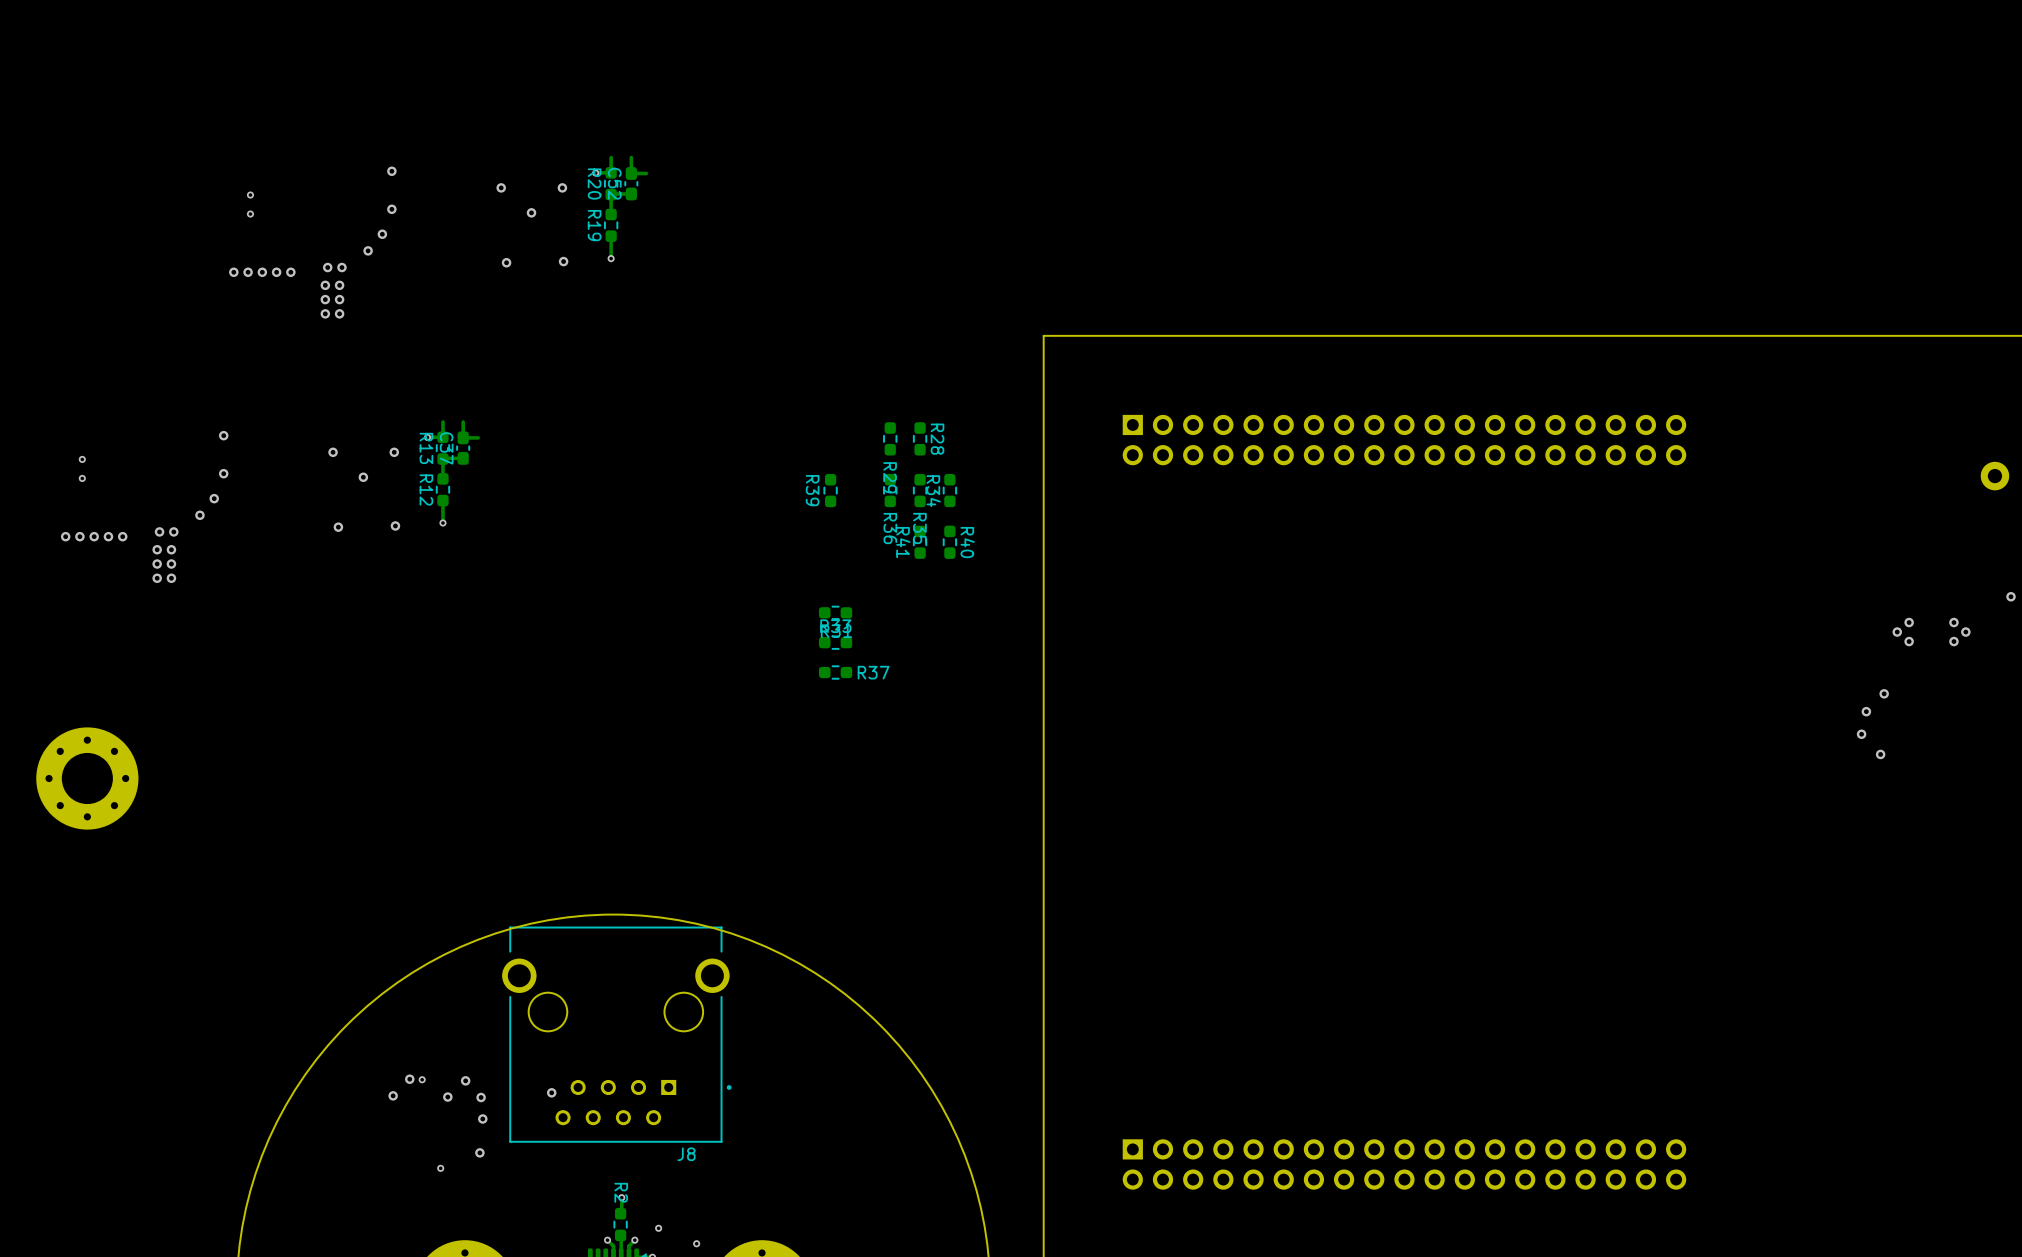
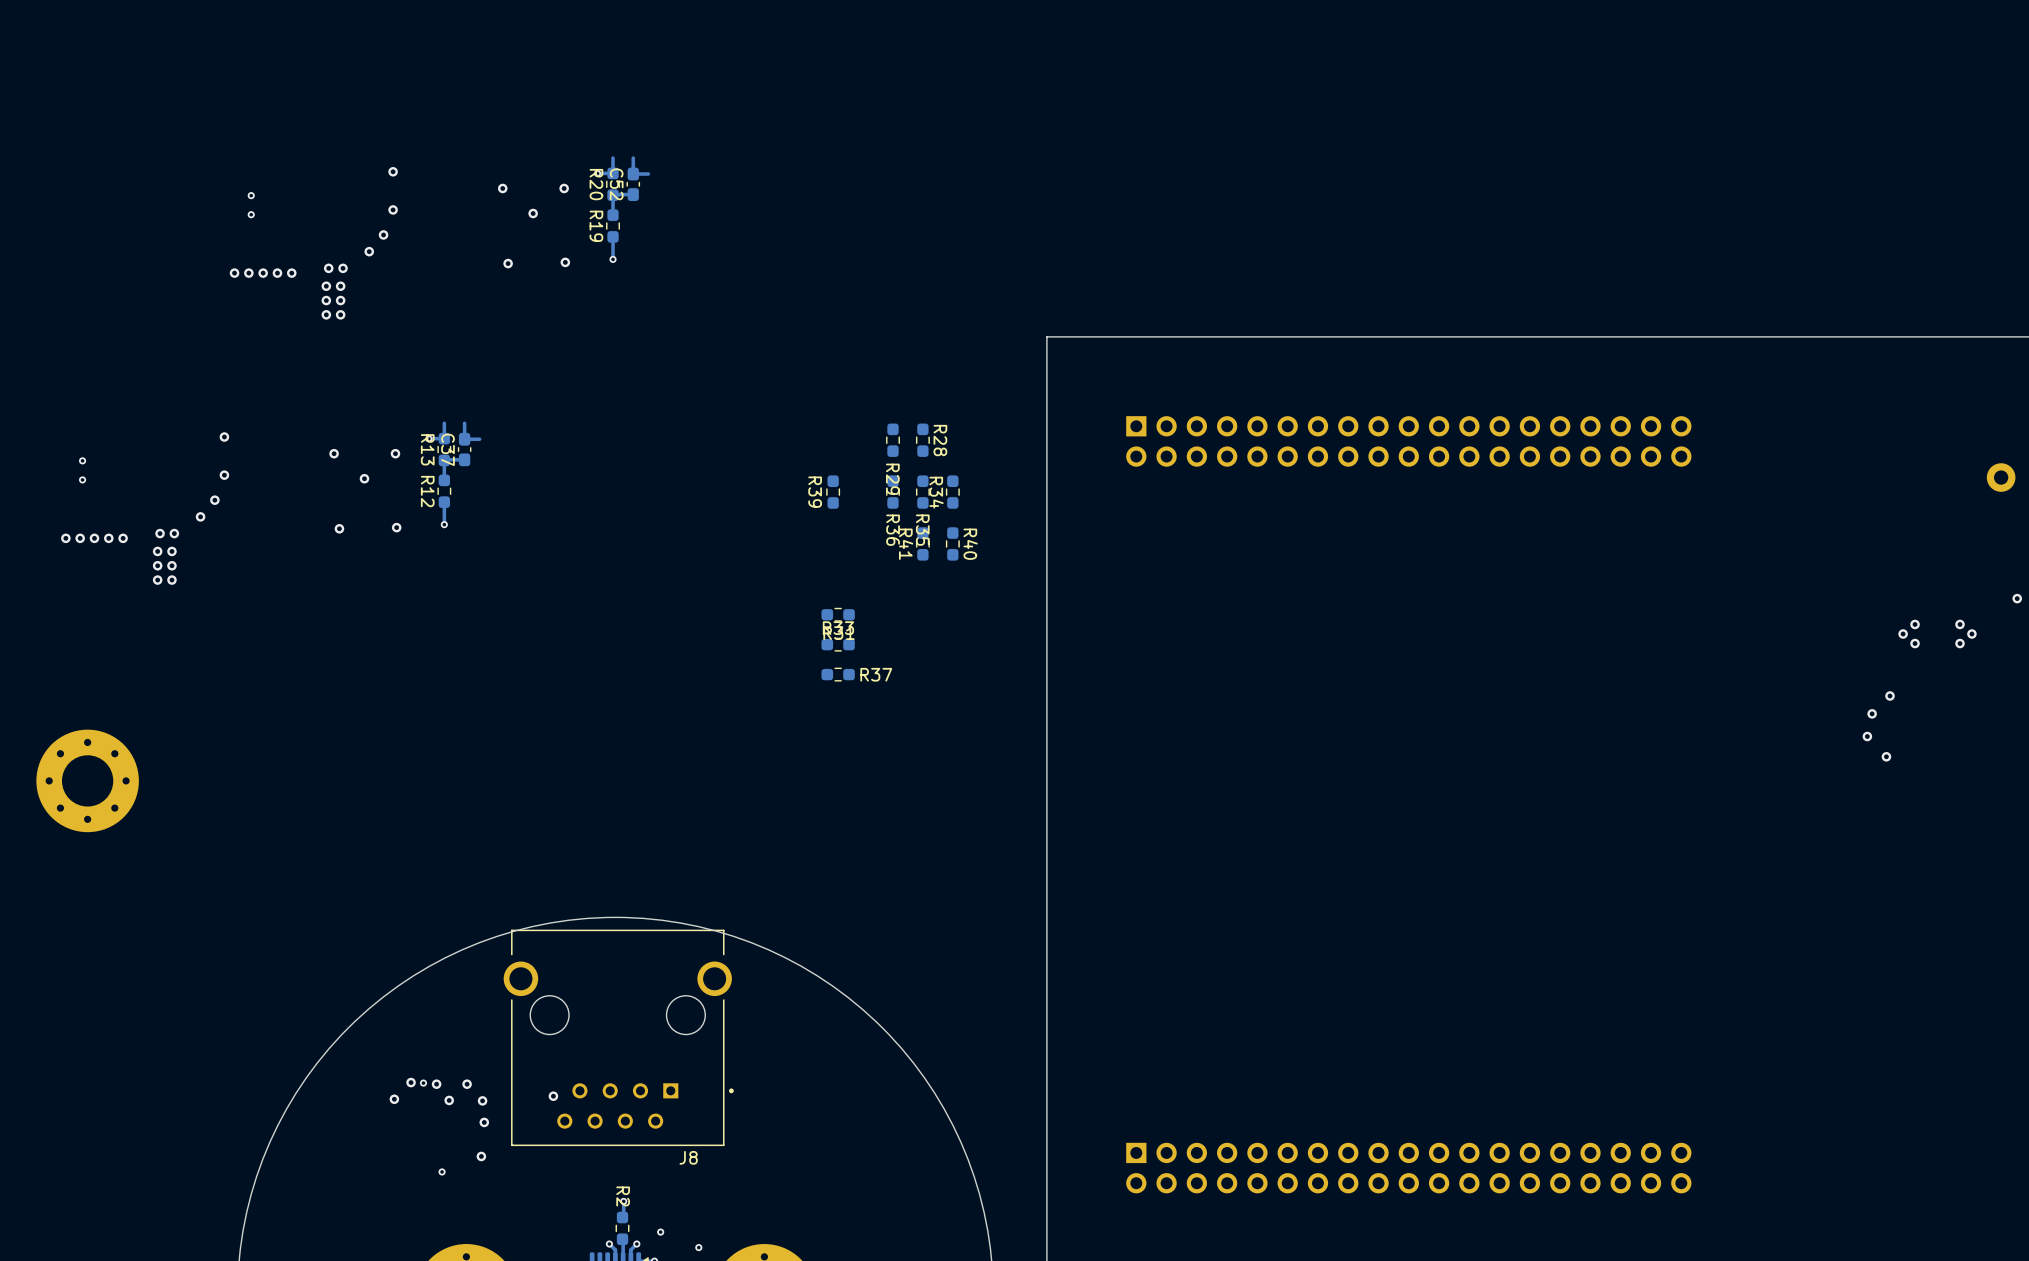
via: none -> (436, 1084)

